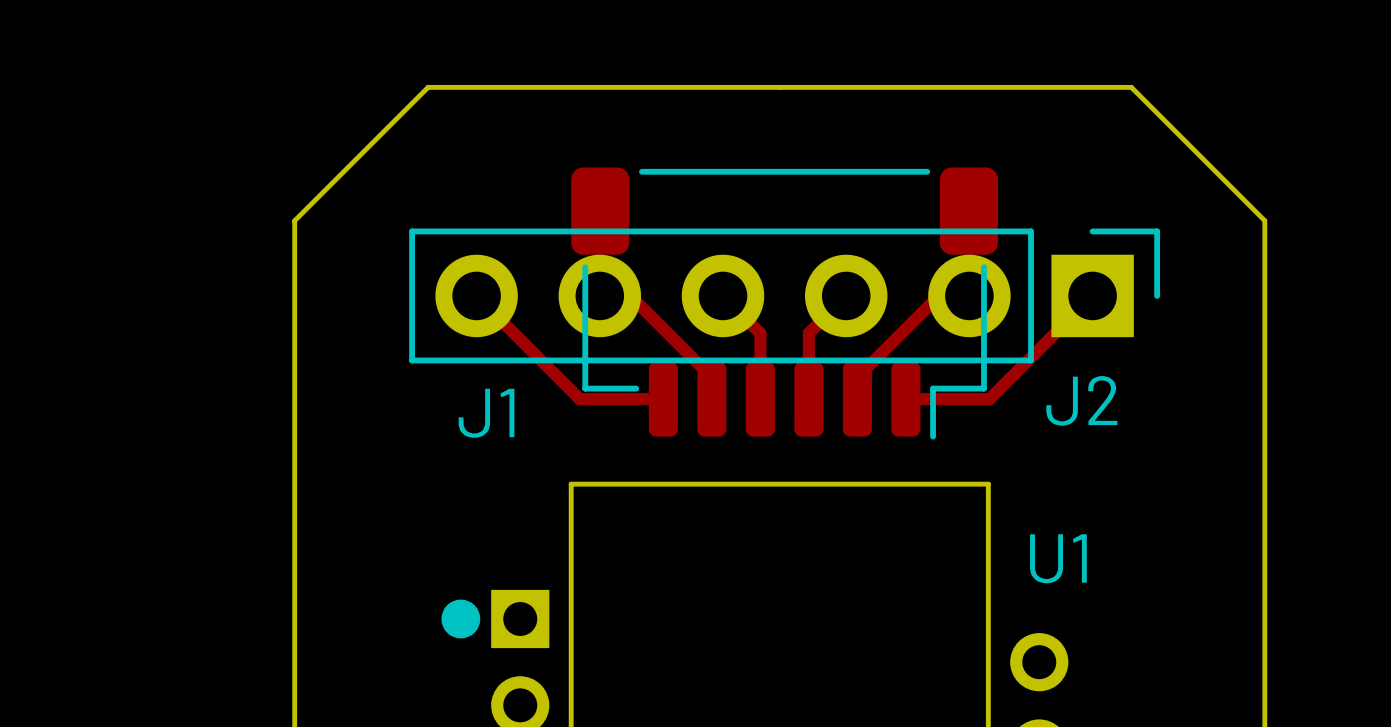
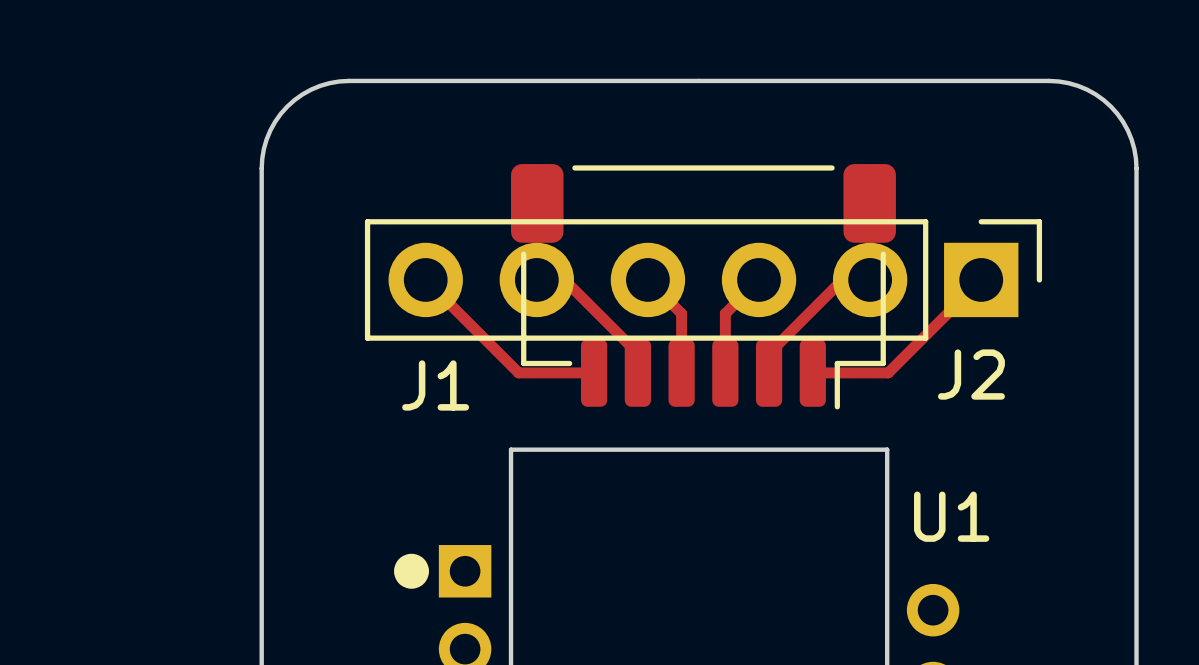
board edge: (294, 220) (428, 87) (1131, 87) (1264, 220) -> (261, 212) (262, 158) (266, 139) (275, 121) (287, 106) (311, 89) (329, 83) (349, 80) (1058, 81) (1077, 85) (1095, 94) (1110, 106) (1123, 121) (1131, 139) (1135, 158) (1136, 212)

